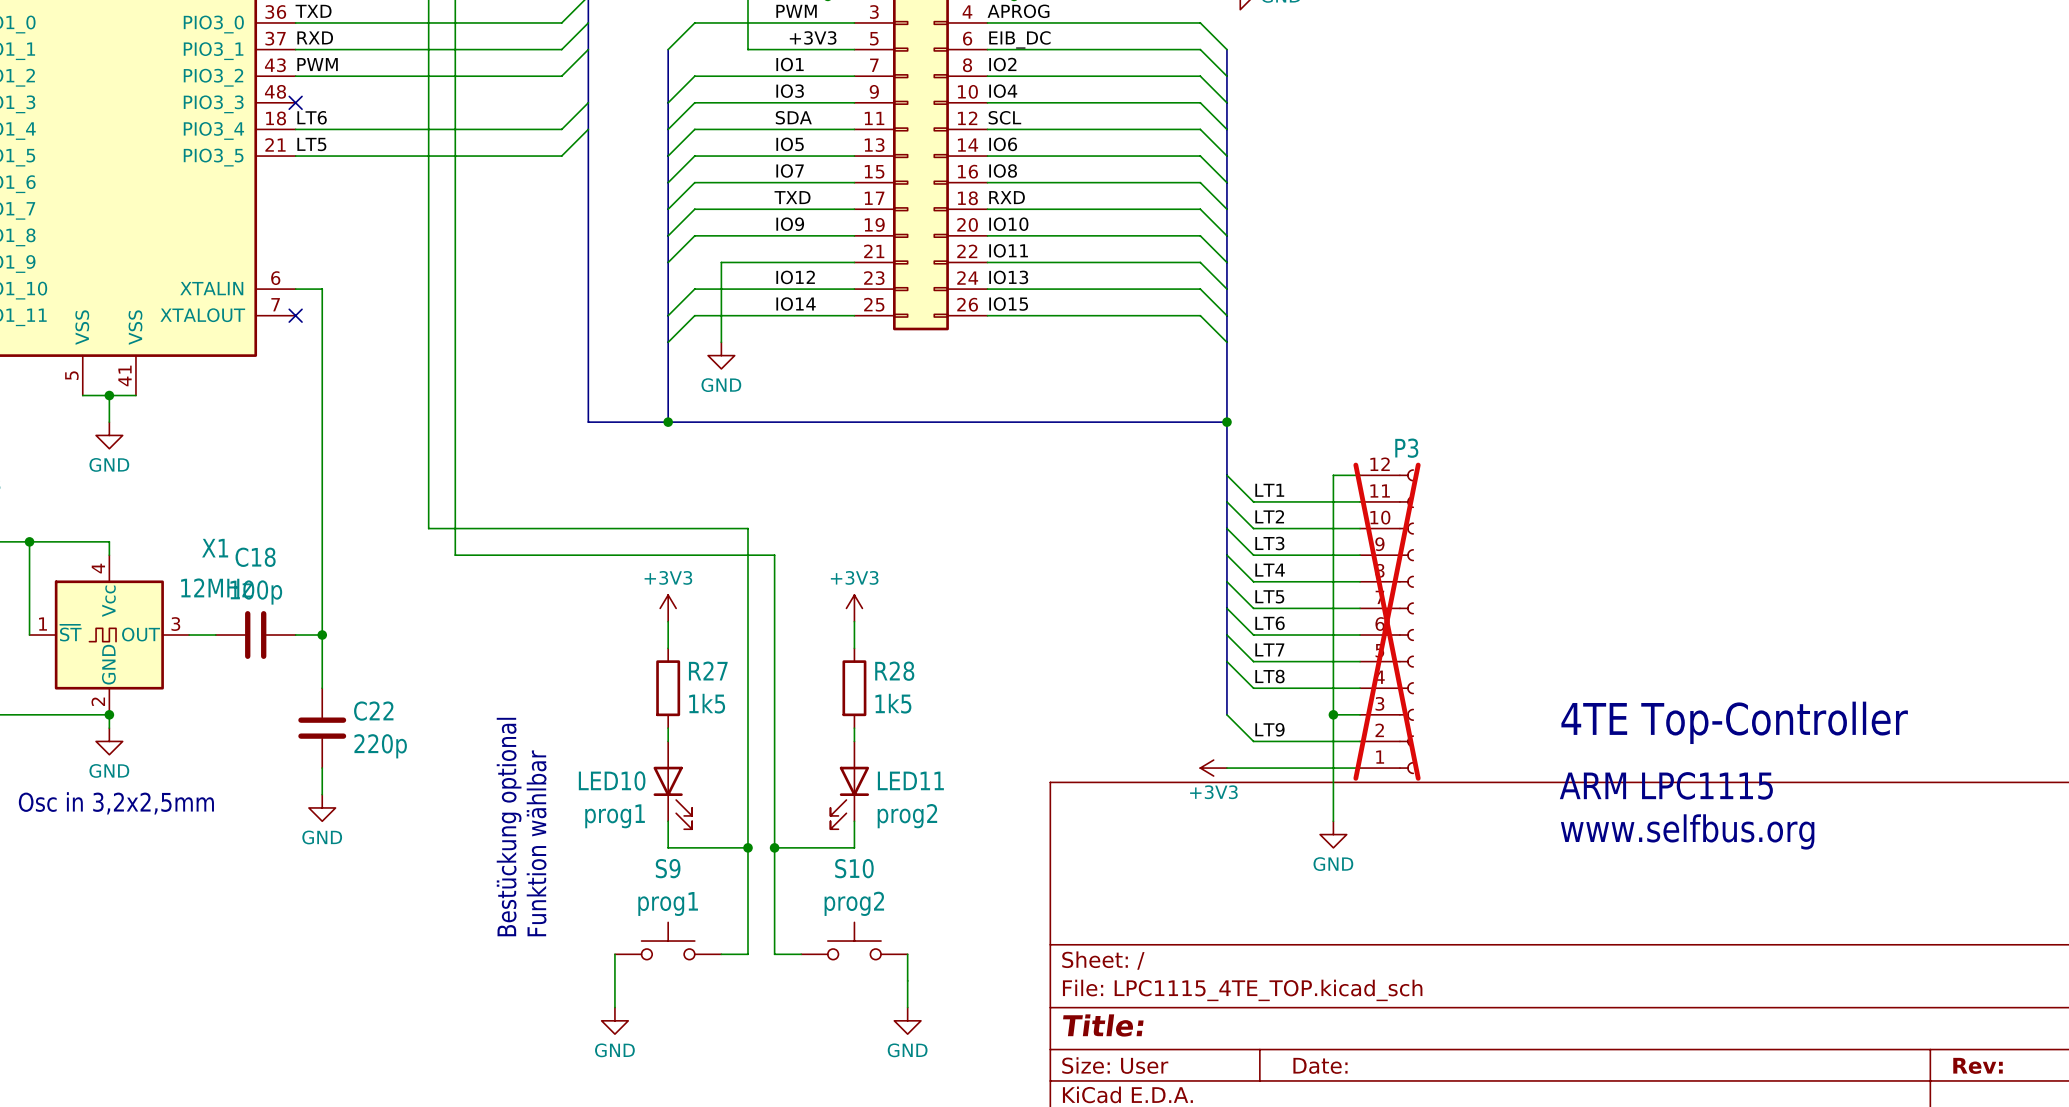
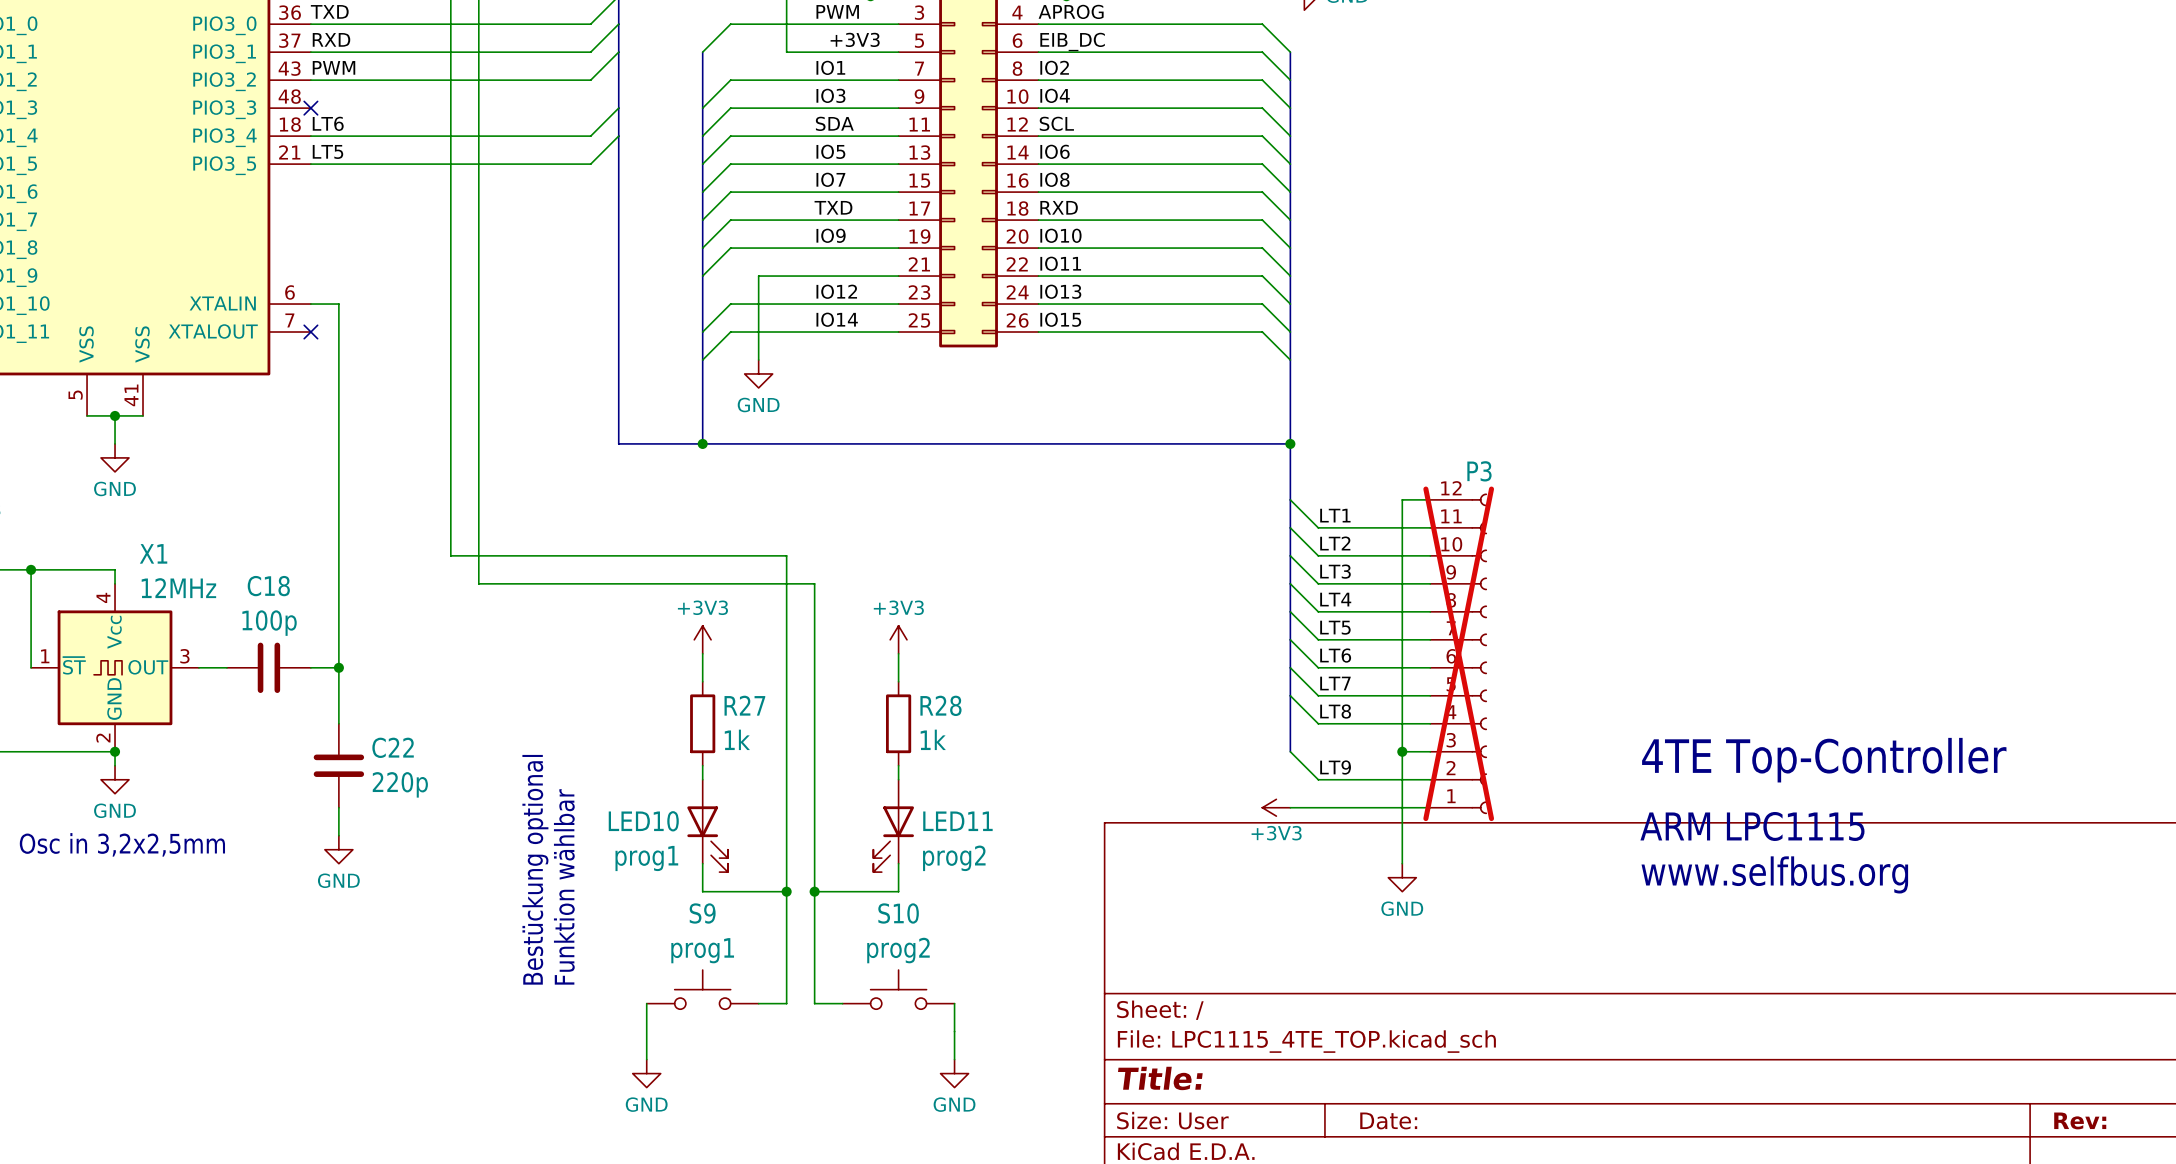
X1 name position: X1 (215, 548) -> X1 (153, 553)
X1 value position: 12MHz (216, 587) -> 12MHz (178, 588)
R27 value: 1k5 (707, 703) -> 1k (737, 739)
R28 value: 1k5 (893, 703) -> 1k (933, 739)

